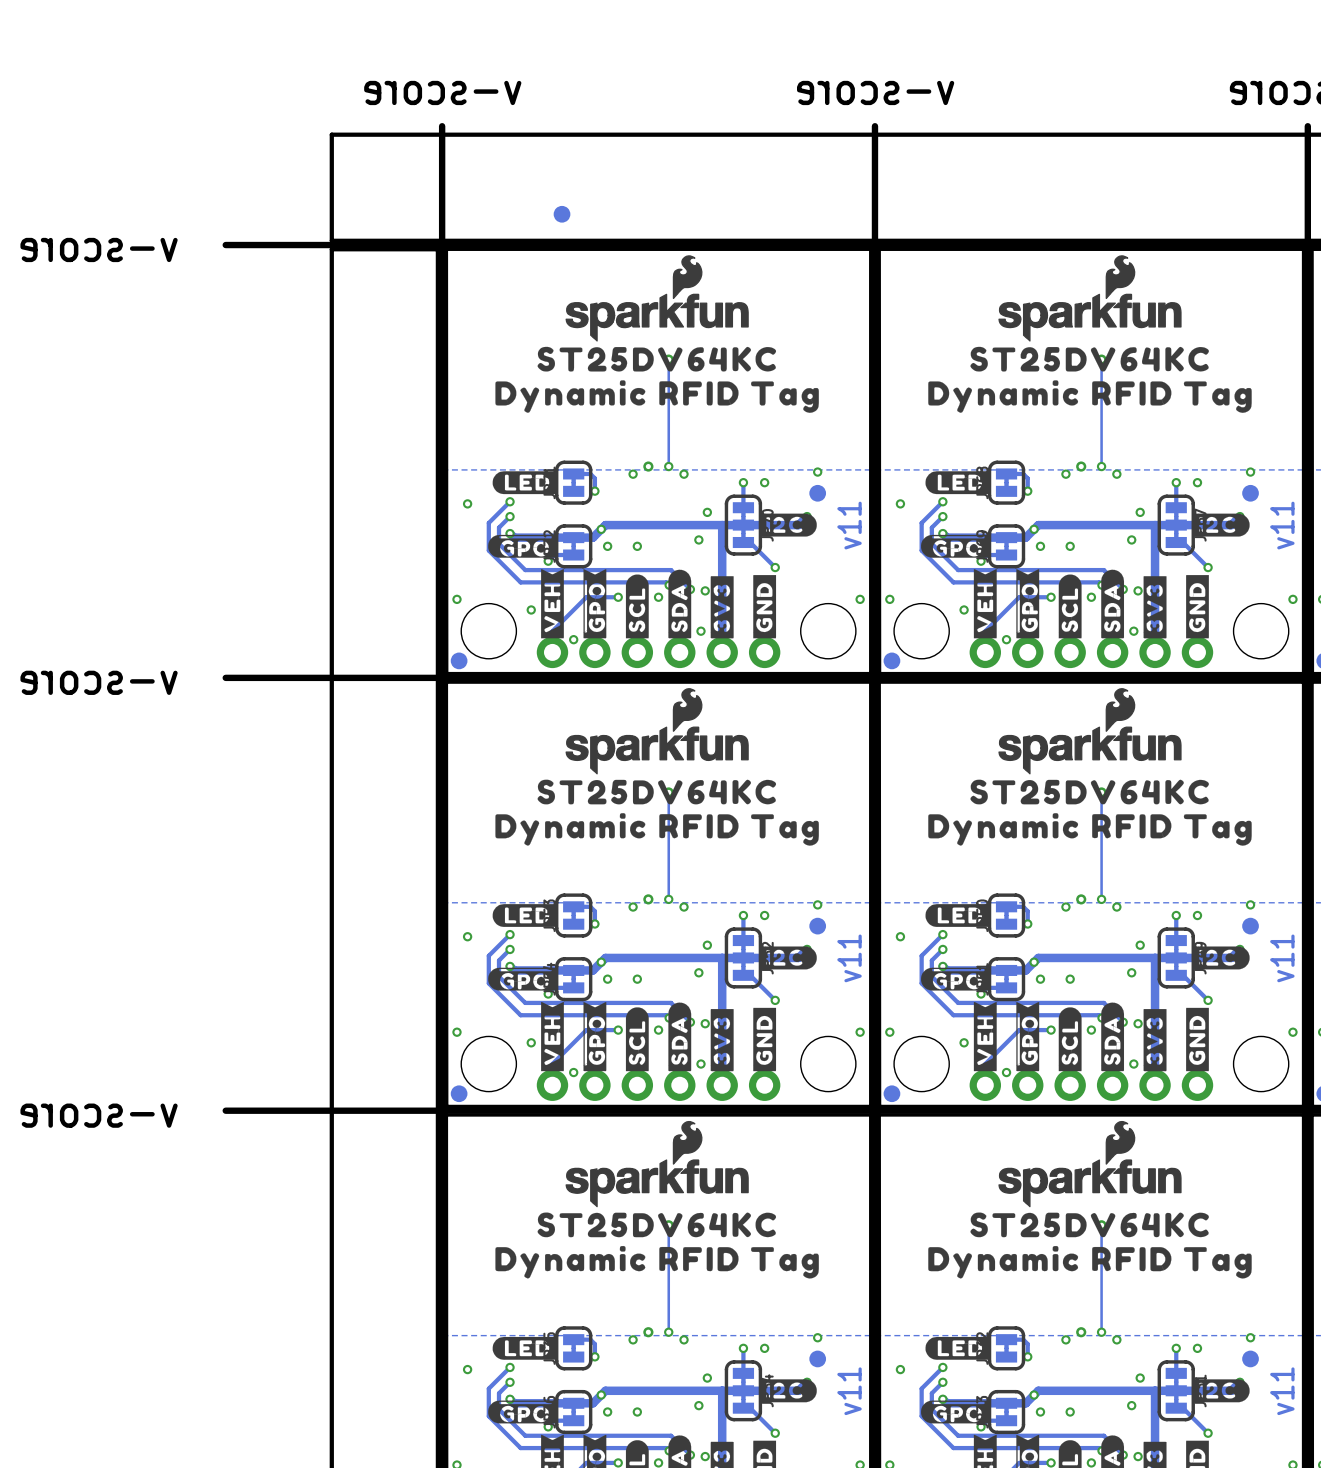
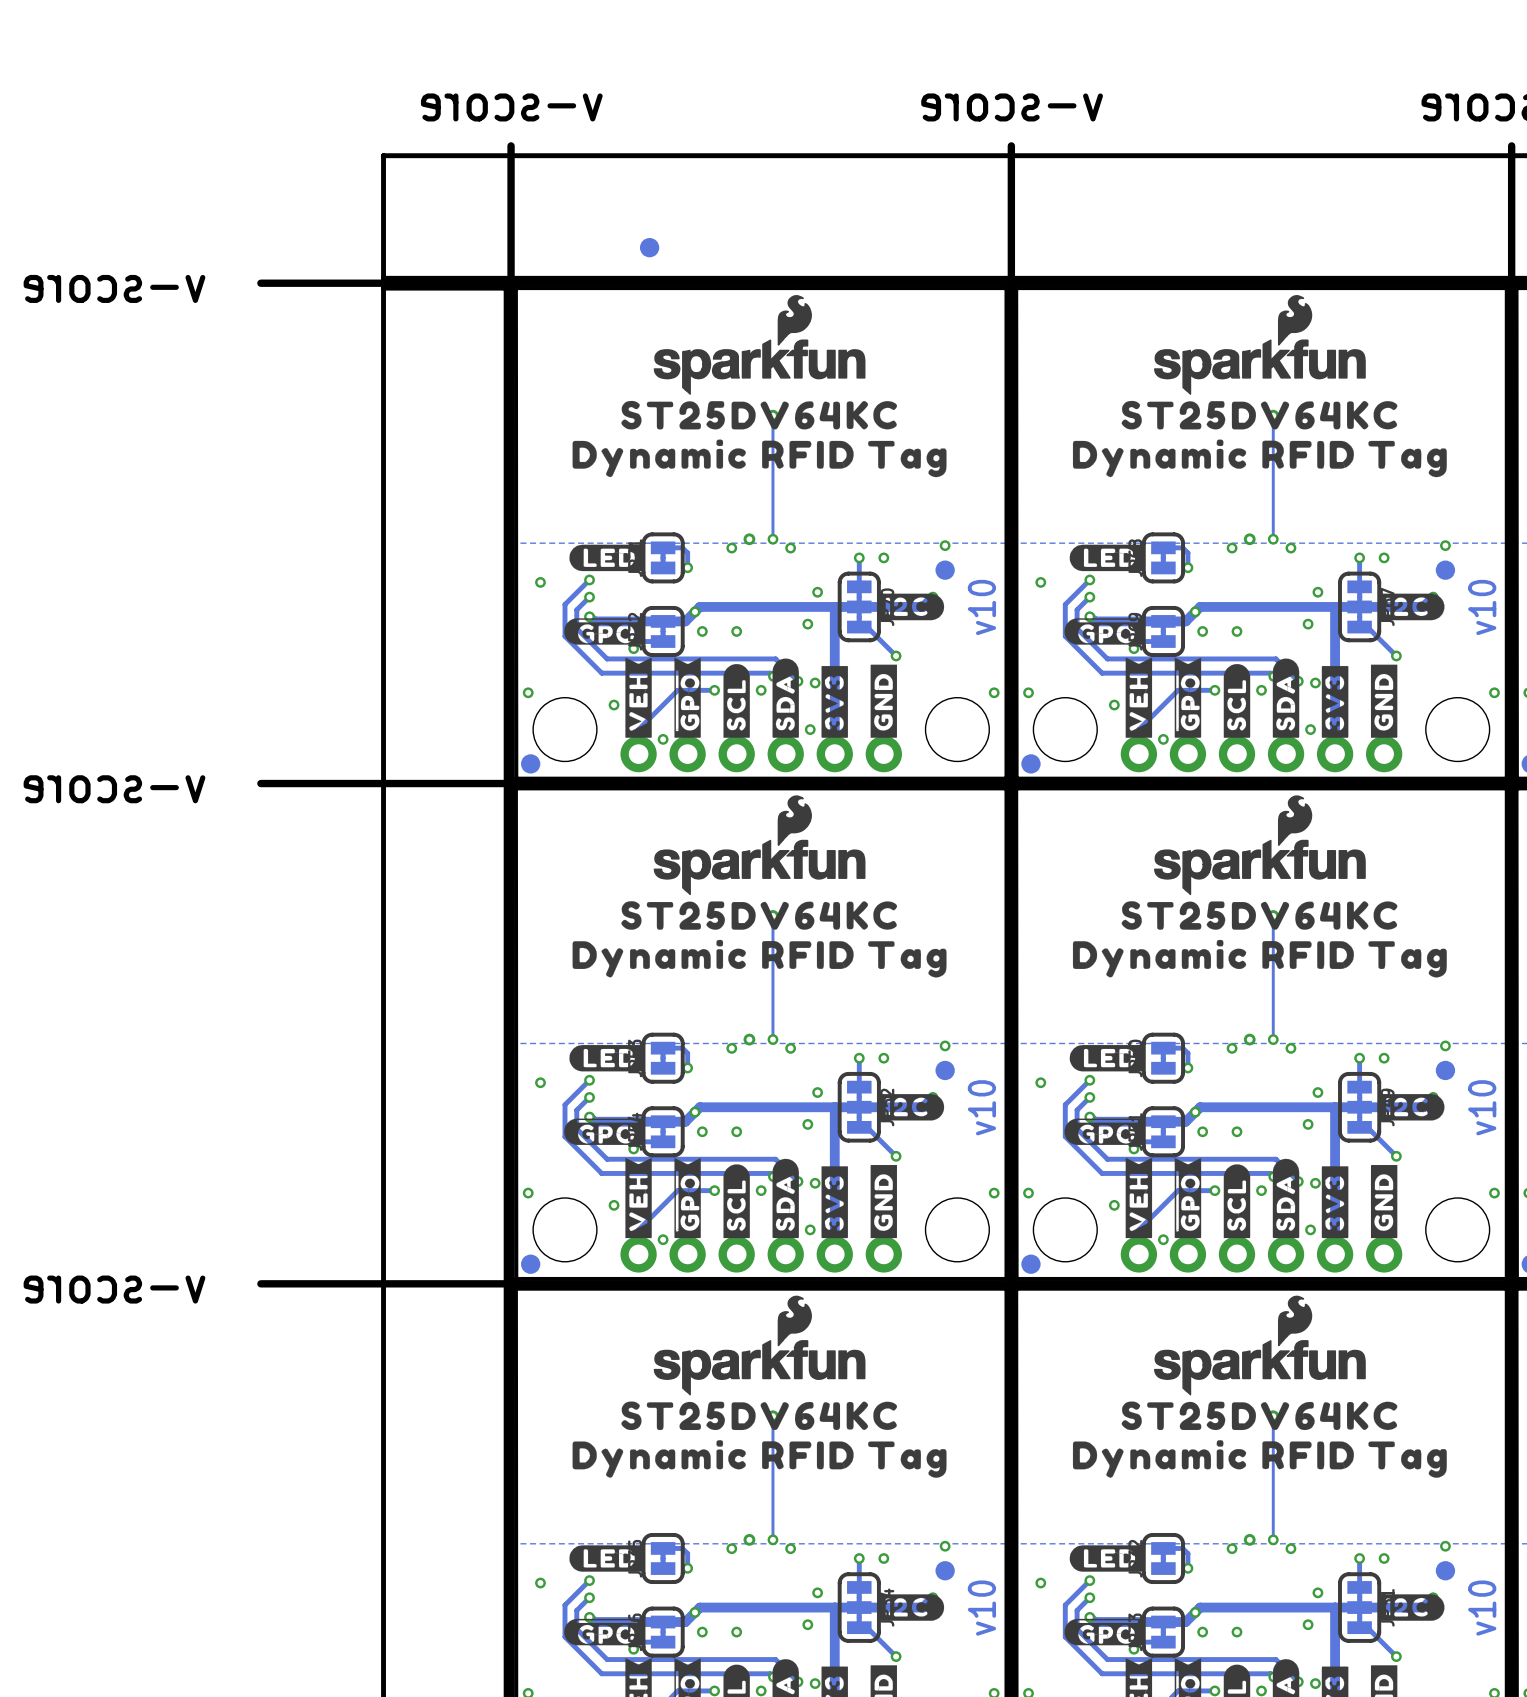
text: v11 (849, 525) -> v10 (981, 607)
text: v11 (1282, 525) -> v10 (1482, 607)
text: v11 (849, 958) -> v10 (981, 1107)
text: v11 (1282, 958) -> v10 (1482, 1107)
text: v11 (849, 1391) -> v10 (981, 1608)
text: v11 (1282, 1391) -> v10 (1482, 1608)

